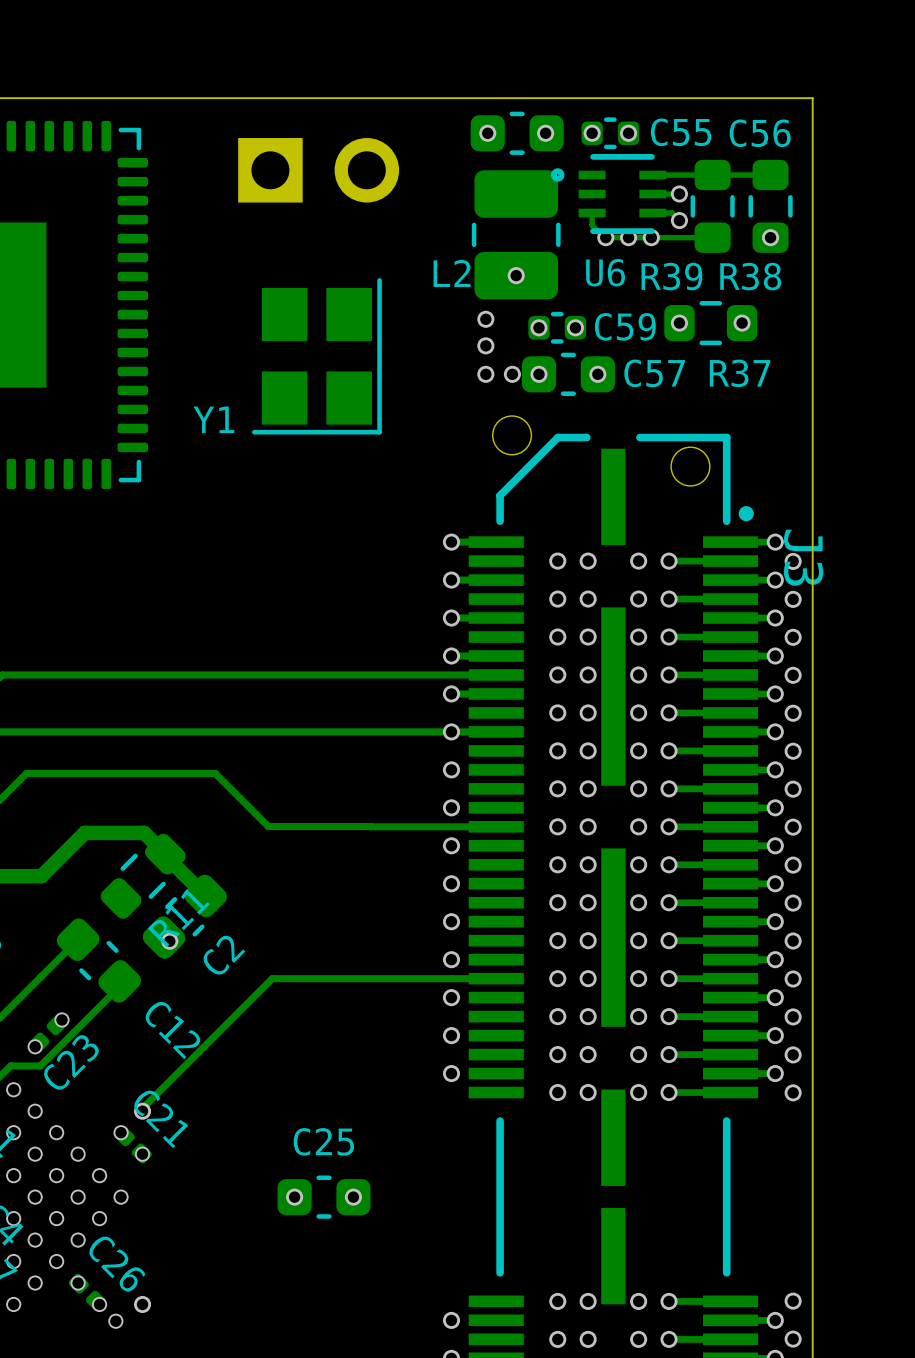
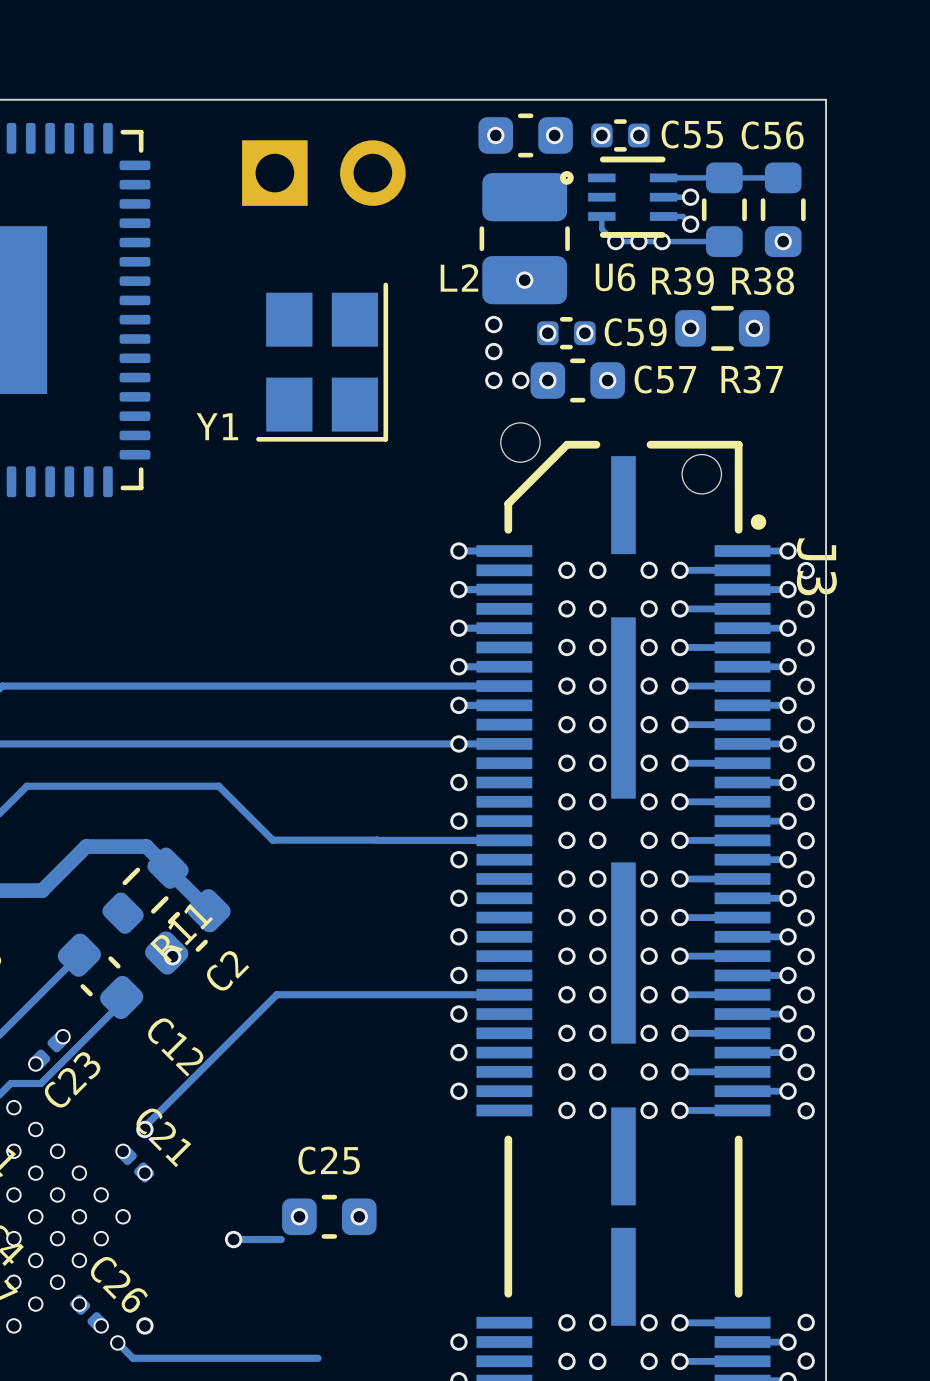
via: none -> (233, 1239)
track: none -> (281, 1239) (233, 1239)
track: none -> (117, 1342) (133, 1358) (318, 1358)

